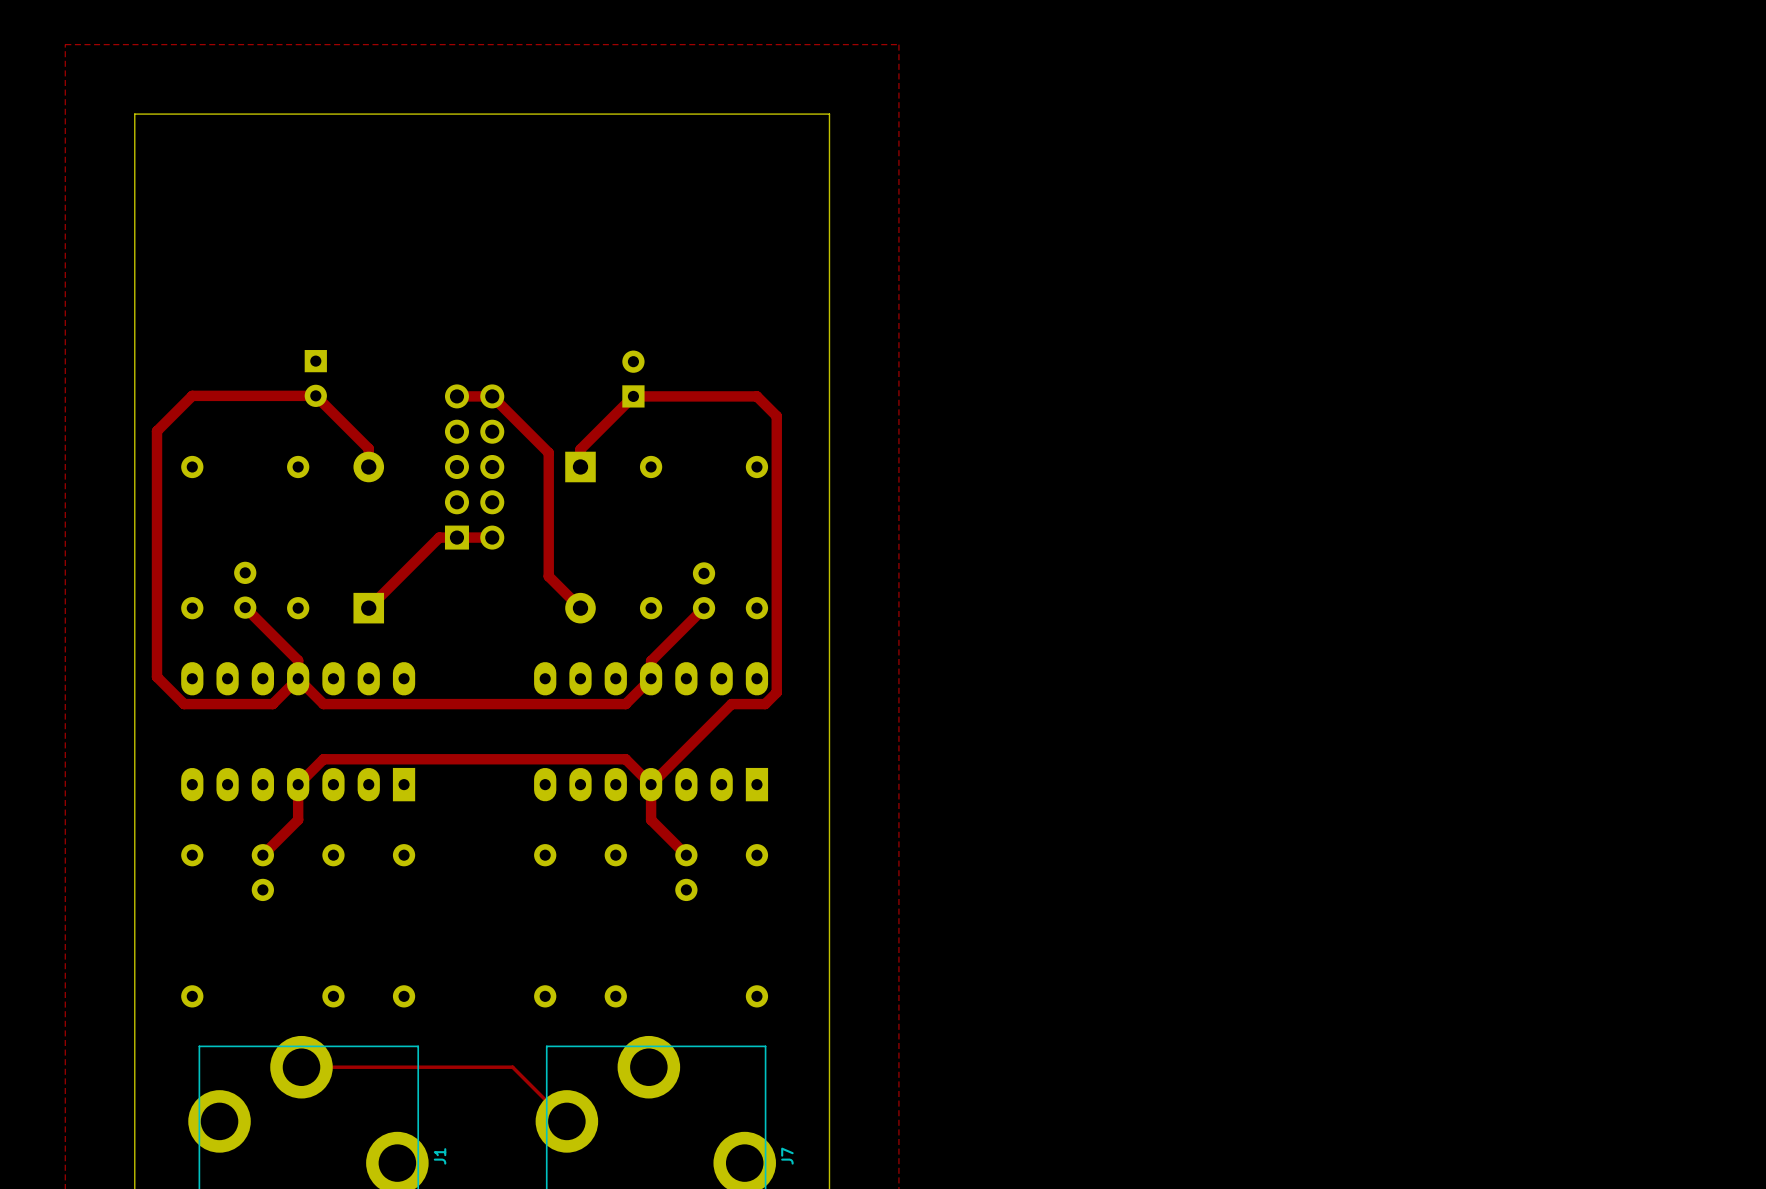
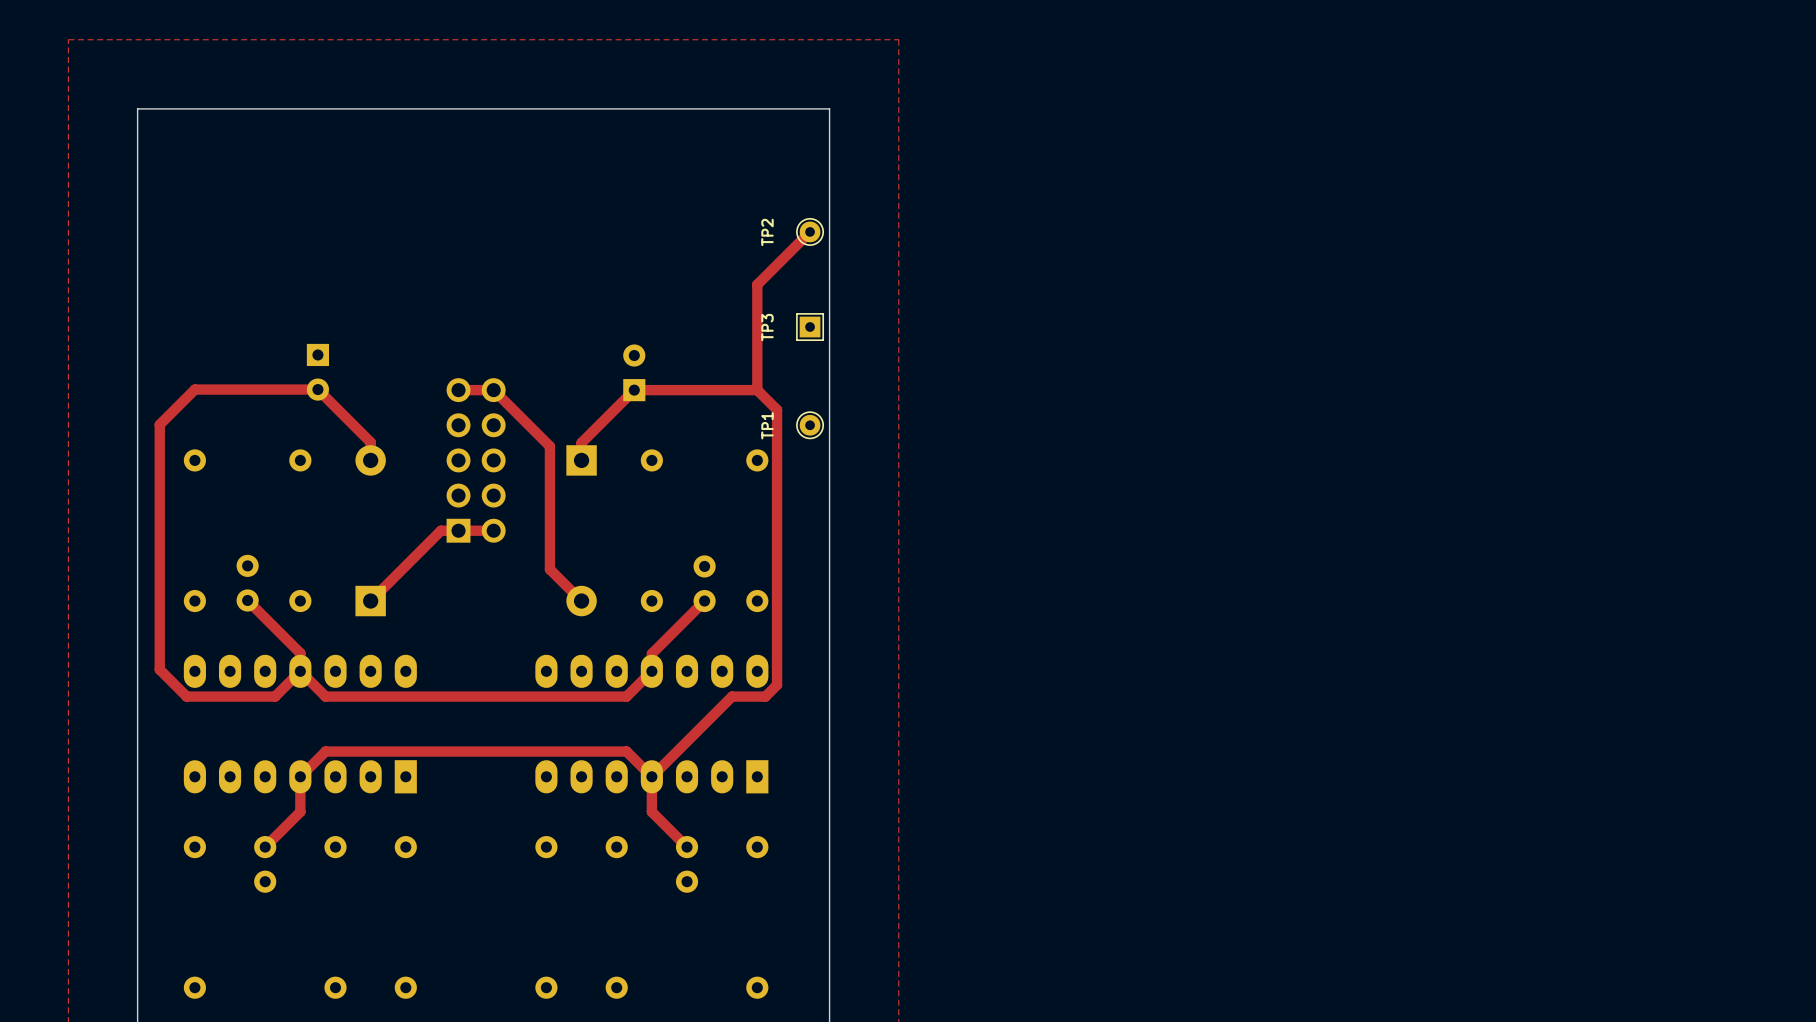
track: none -> (810, 231) (757, 284) (757, 390)
TP2: none -> (810, 231)
TP3: none -> (810, 327)
TP1: none -> (810, 425)

